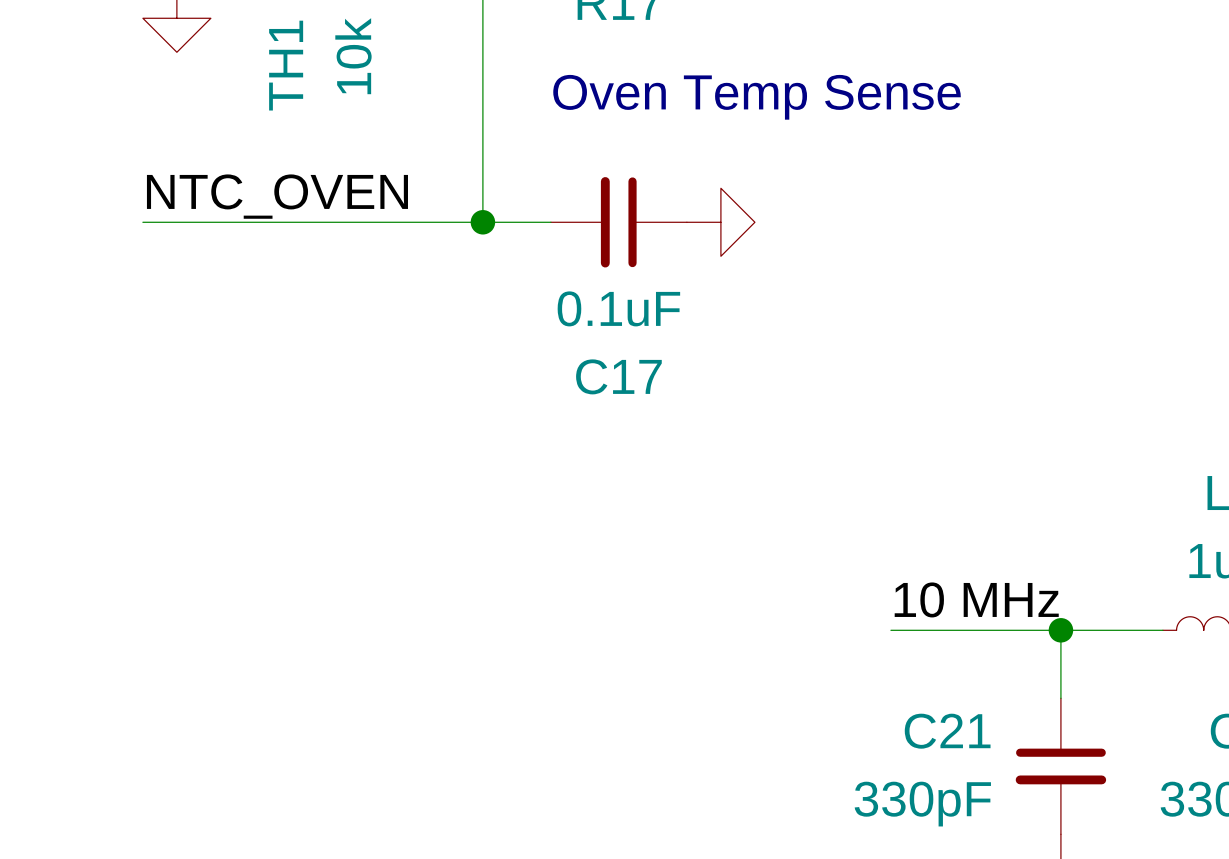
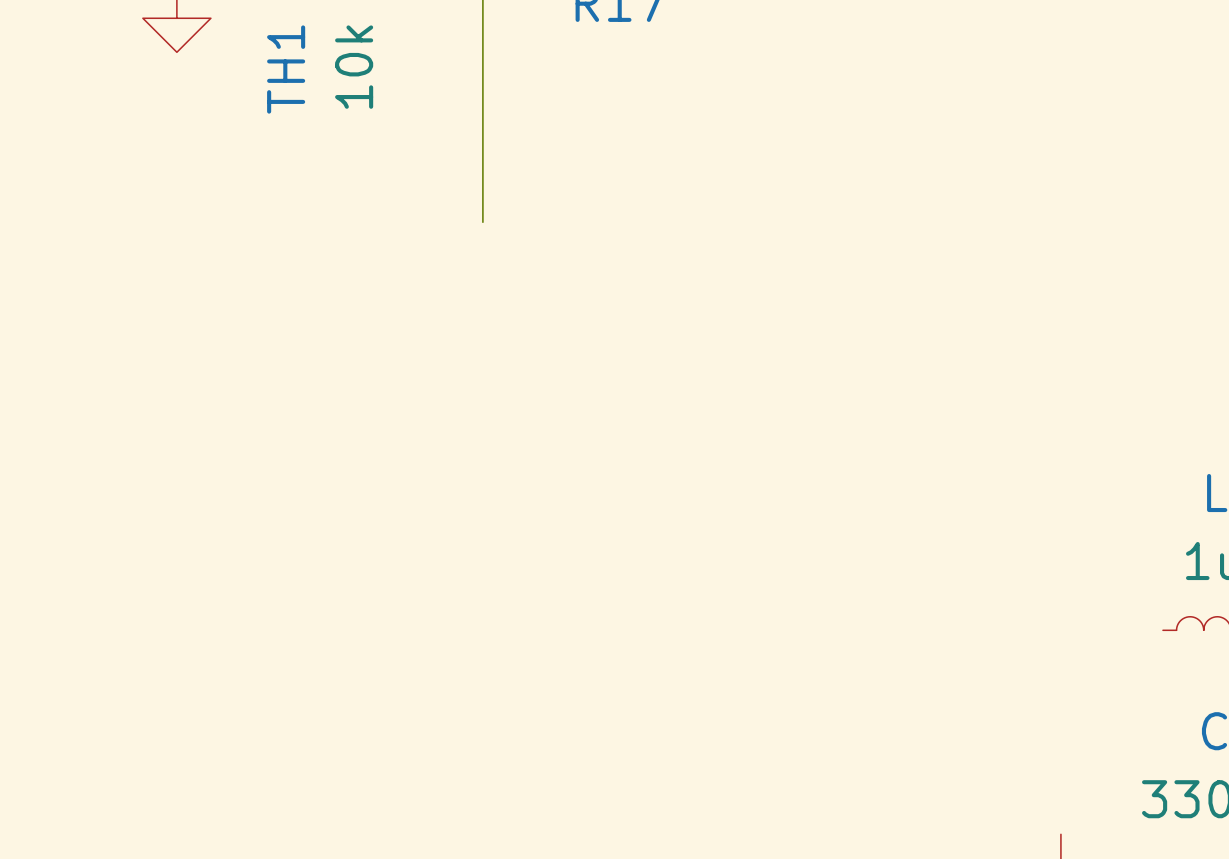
text: Oven Temp Sense (757, 97) -> none
label: NTC_OVEN (277, 196) -> none
wire: (142, 222) (550, 222) -> none
junction: (482, 222) -> none
C17: 0.1uF (618, 222) -> none
power symbol: (720, 222) -> none
label: 10 MHz (976, 599) -> none
wire: (890, 630) (1162, 630) -> none
wire: (1060, 630) (1060, 698) -> none
junction: (1060, 630) -> none
C21: 330pF (1060, 766) -> none

